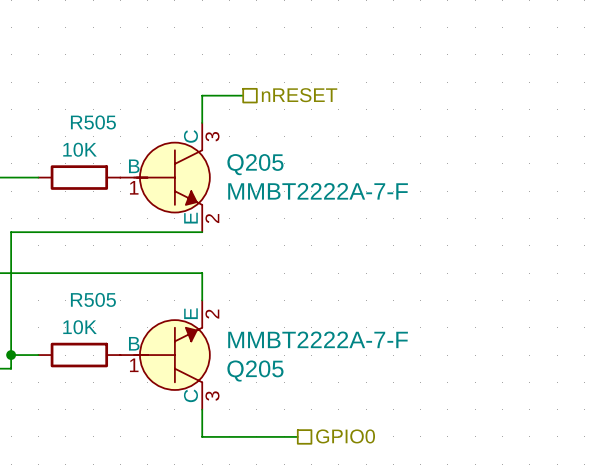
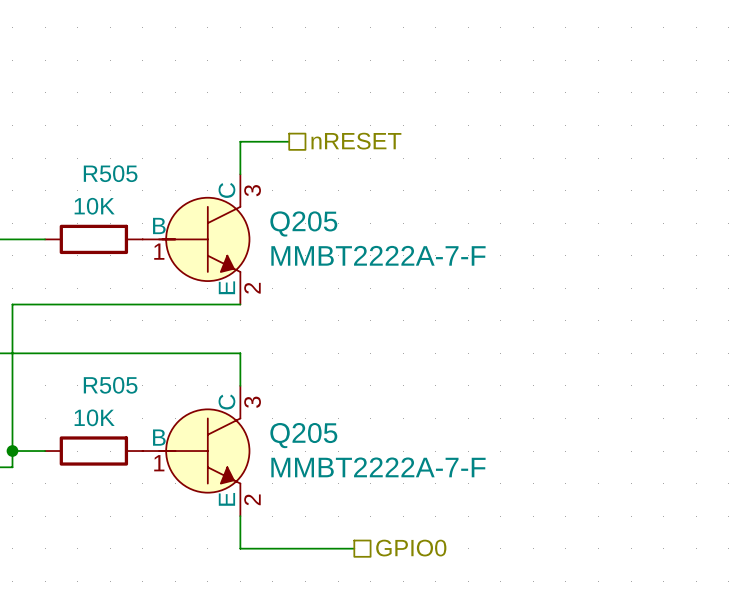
Q205 flip: as is (171, 355) -> up-down (204, 451)

